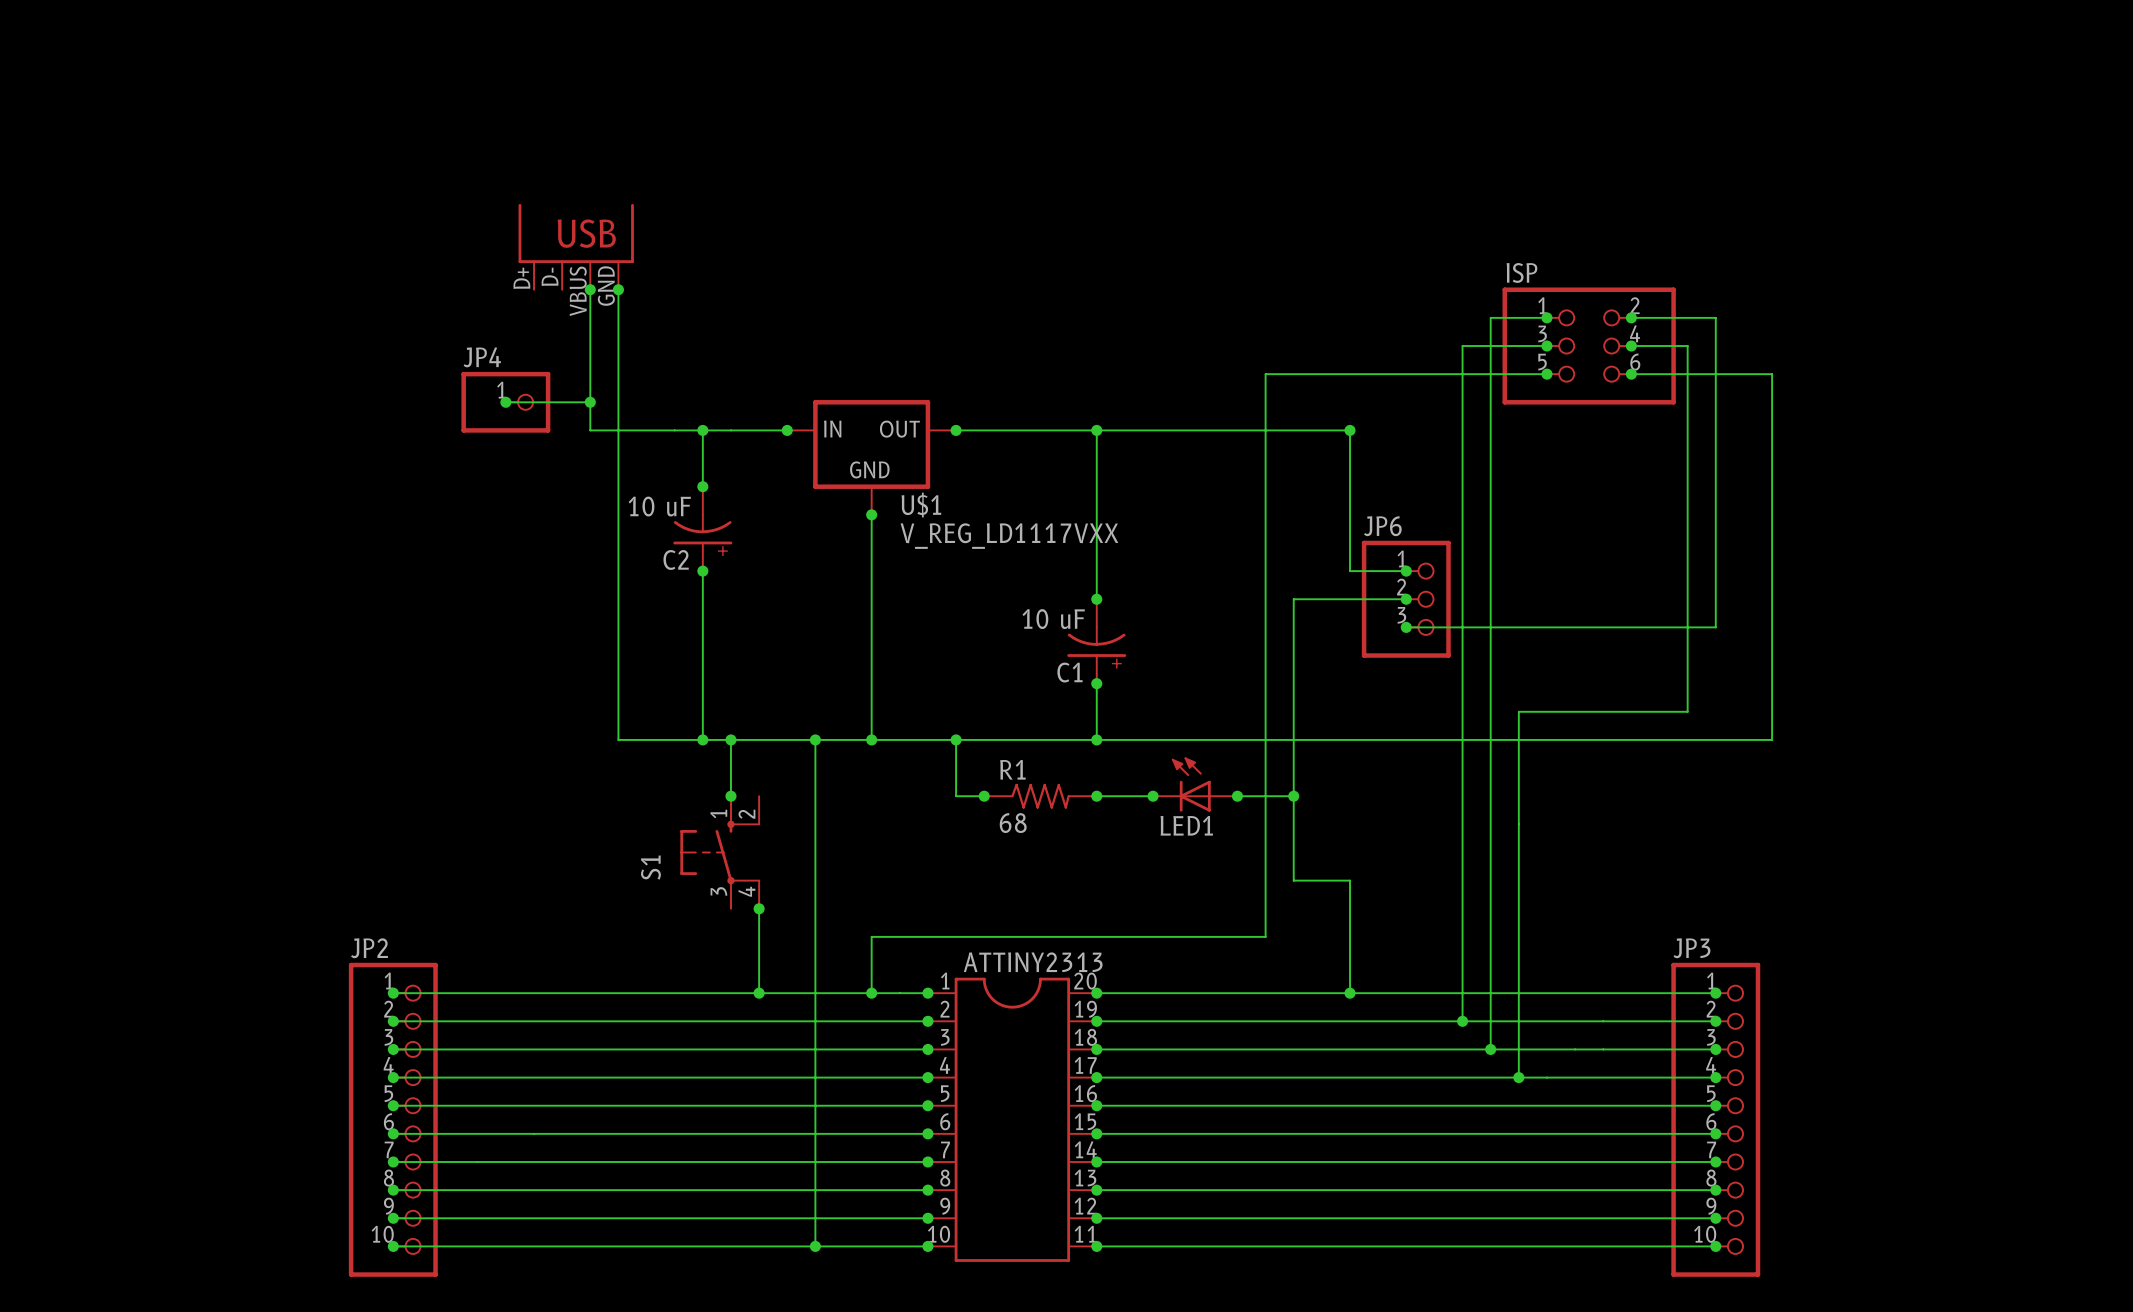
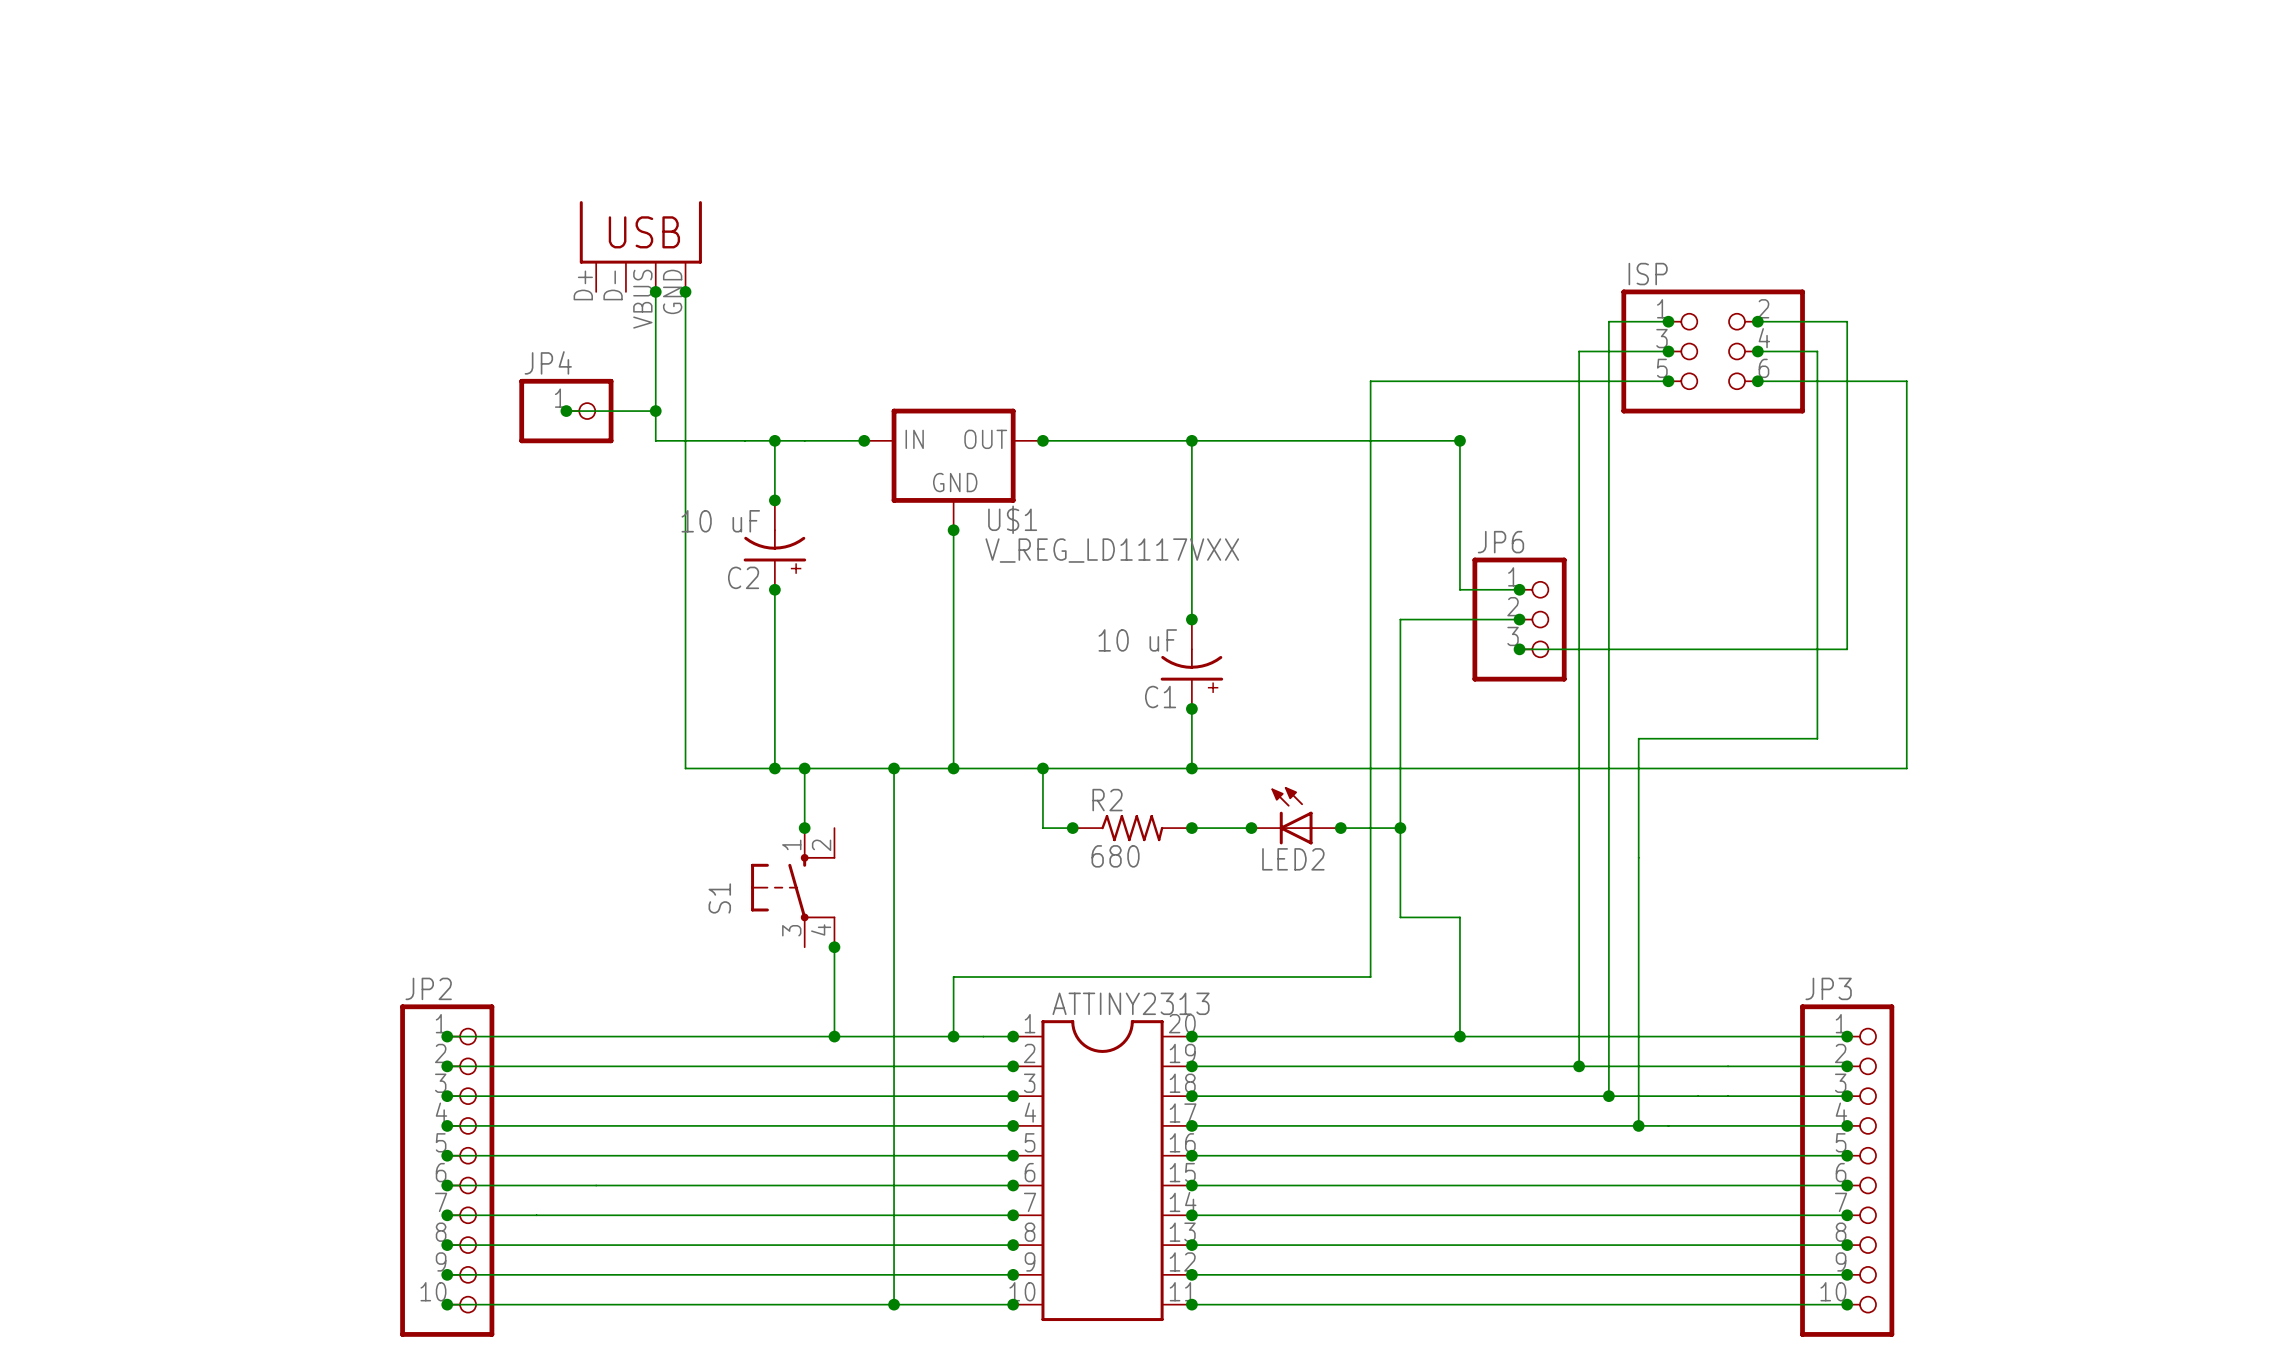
R1 name: R1 (1012, 769) -> R2 (1107, 800)
R1 value: 68 (1013, 823) -> 680 (1115, 856)
LED1 name: LED1 (1186, 825) -> LED2 (1293, 859)

